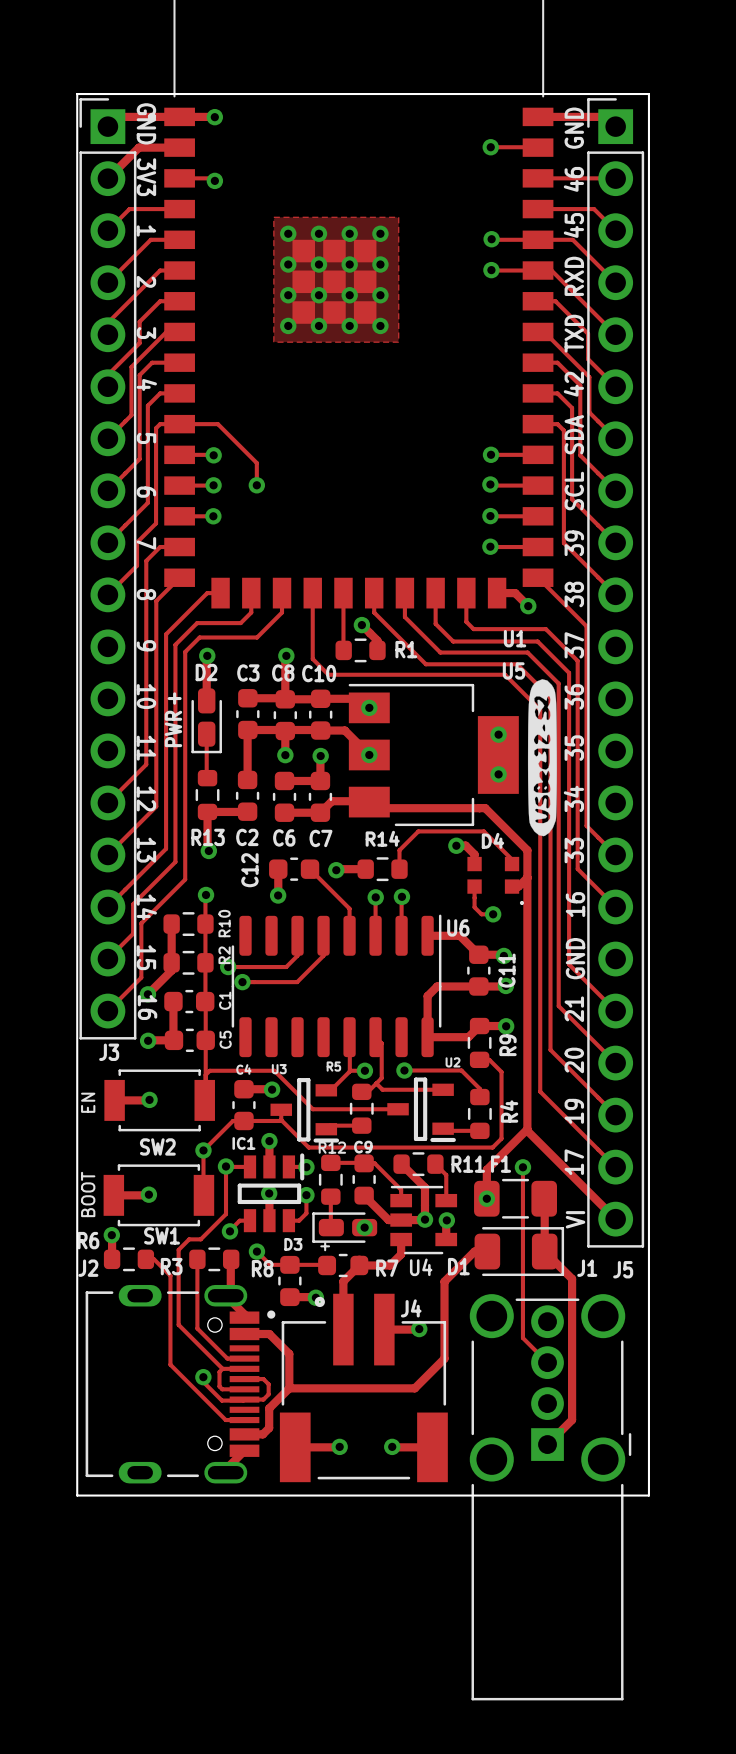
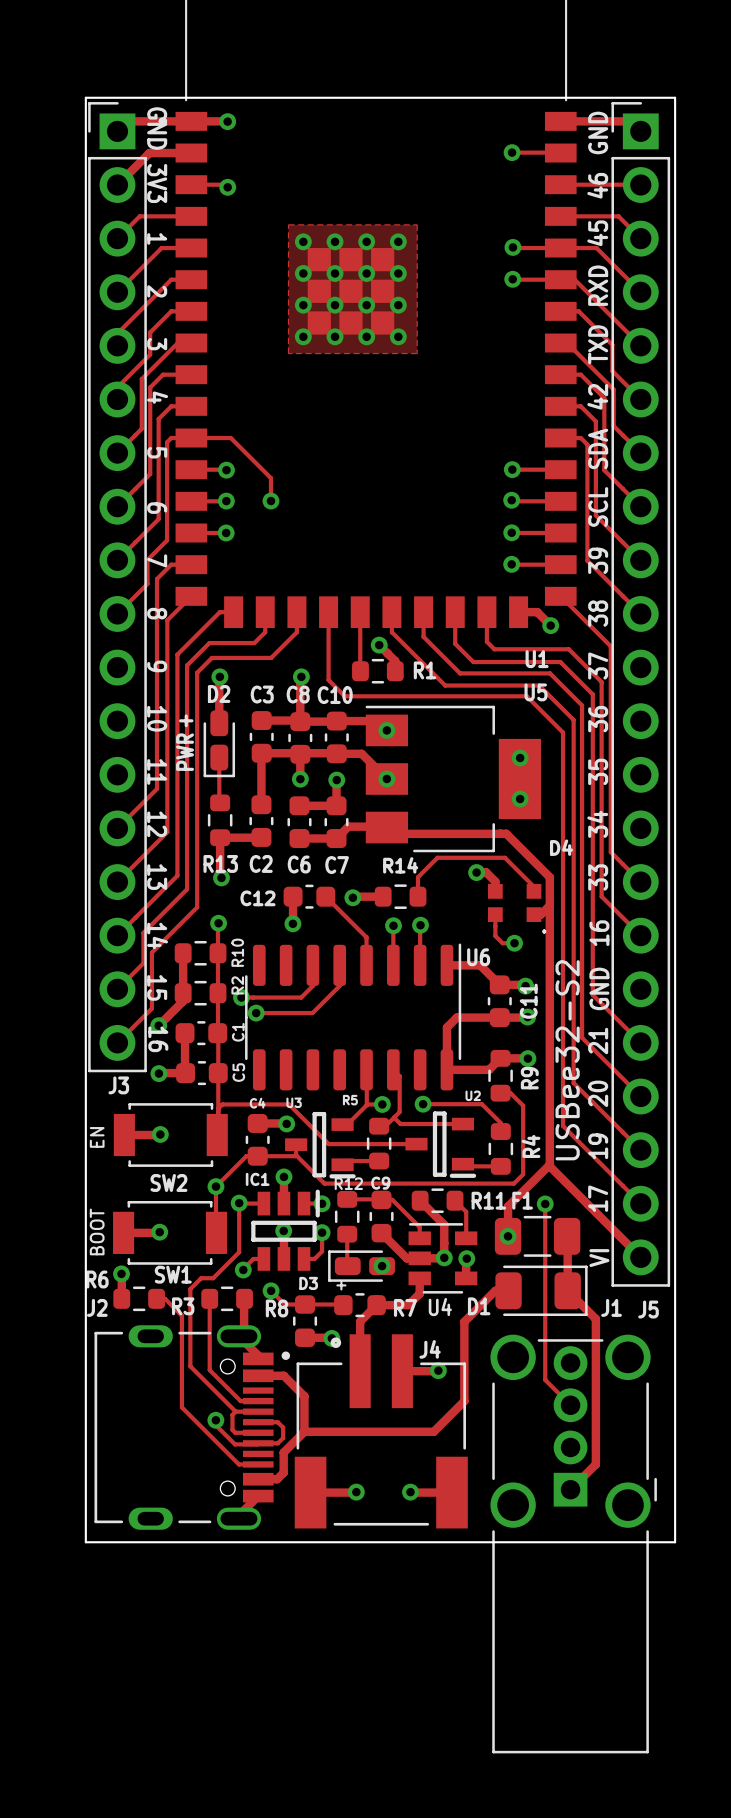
drawing: [527, 679, 557, 837] -> none
D4 name position: D4 (492, 840) -> D4 (561, 847)
C12 name rotation: 0° (249, 870) -> 90° clockwise (257, 898)
text: none -> USBee32-S2 (567, 1060)

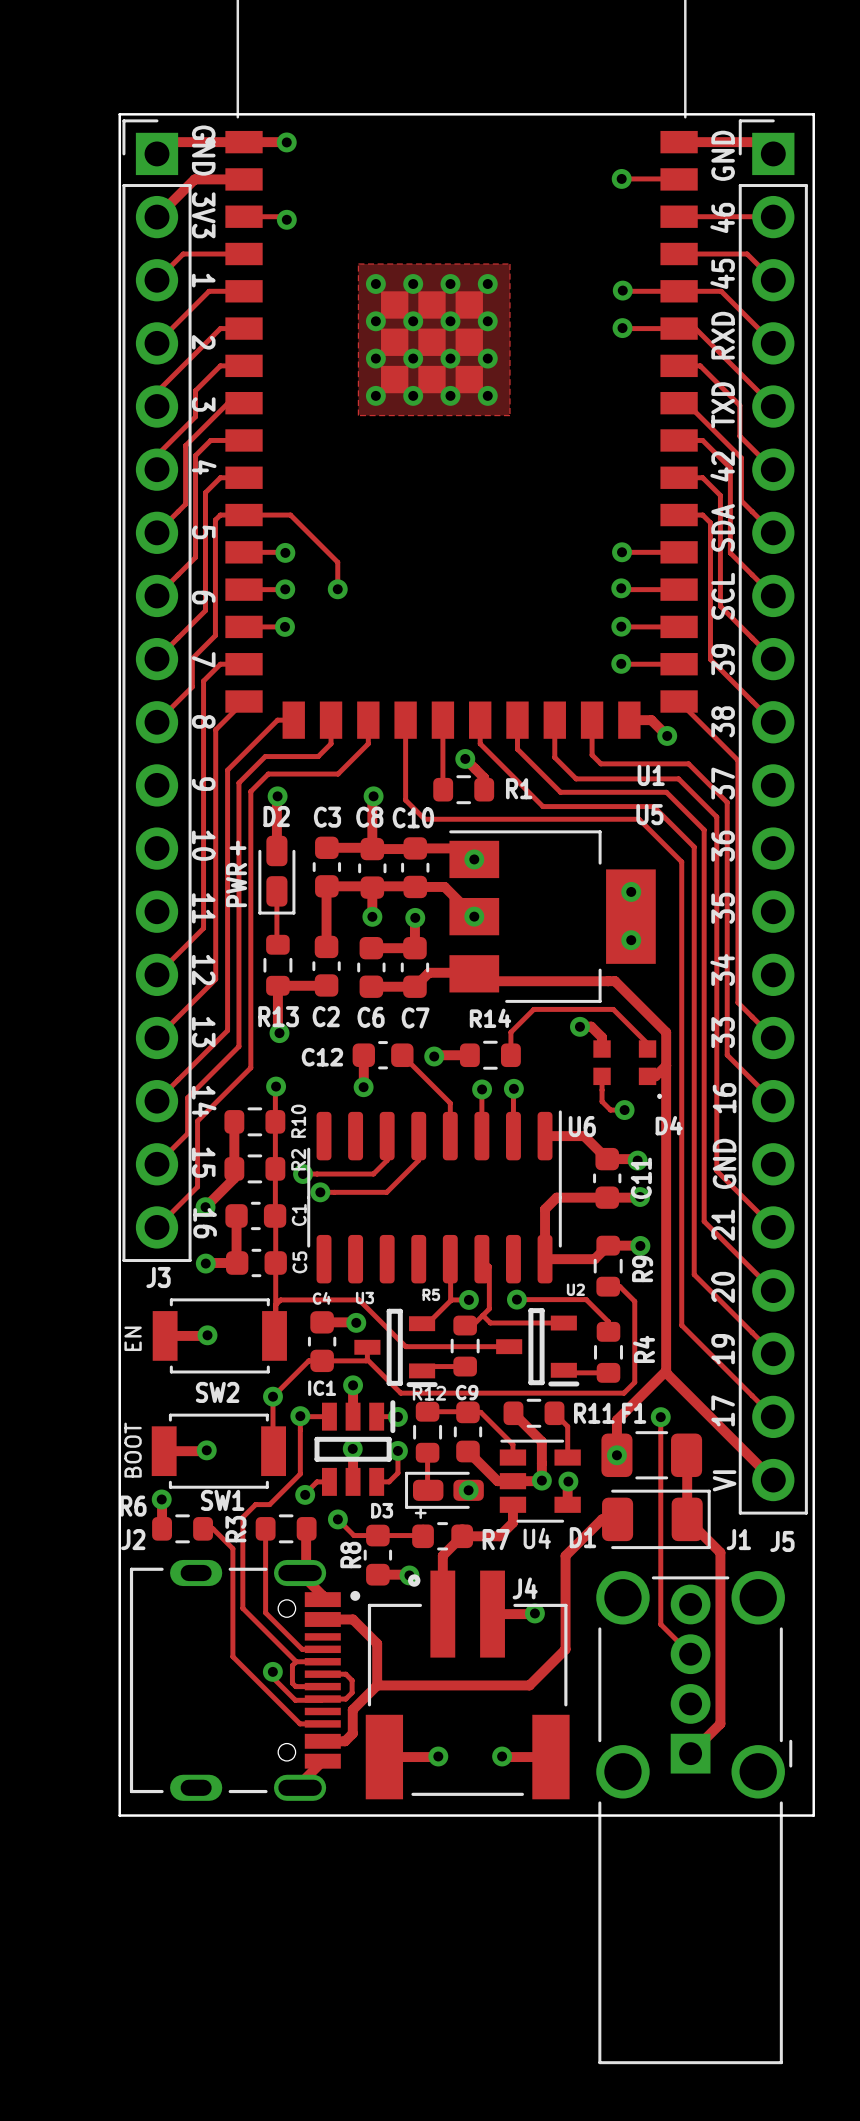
D4 name position: D4 (561, 847) -> D4 (669, 1125)
text: USBee32-S2 (567, 1060) -> none
R3 name rotation: 0° (183, 1306) -> 90° counterclockwise (235, 1529)
R8 name rotation: 0° (277, 1308) -> 90° counterclockwise (350, 1555)

